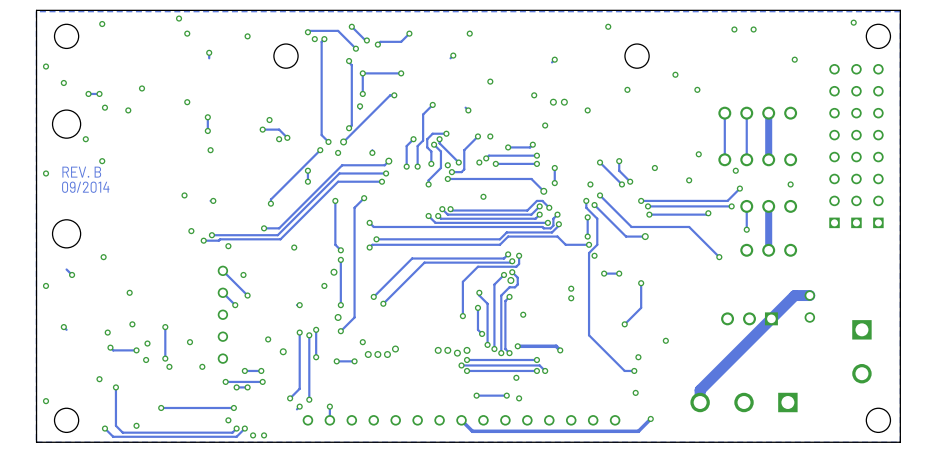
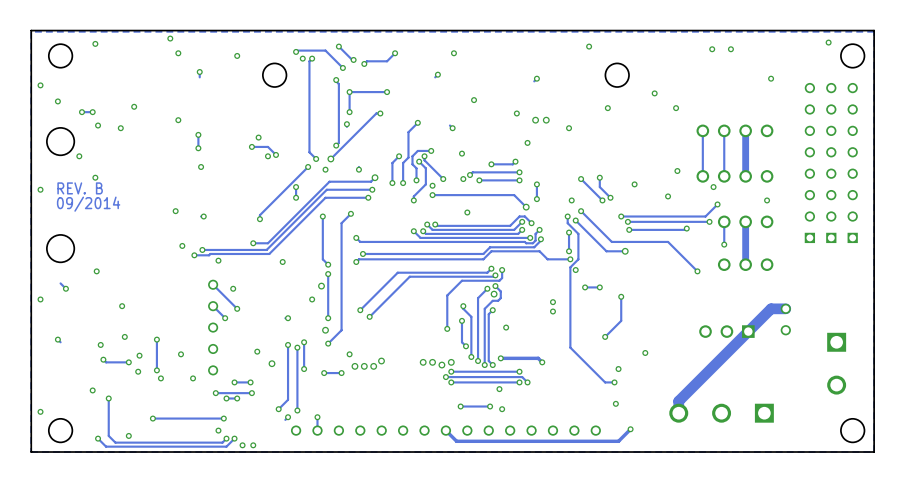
track: (477, 136) (464, 150) (464, 169) (461, 172) (451, 172) -> none
via: (490, 136) -> none
via: (447, 165) -> none
via: none -> (432, 185)
via: (451, 172) -> none

